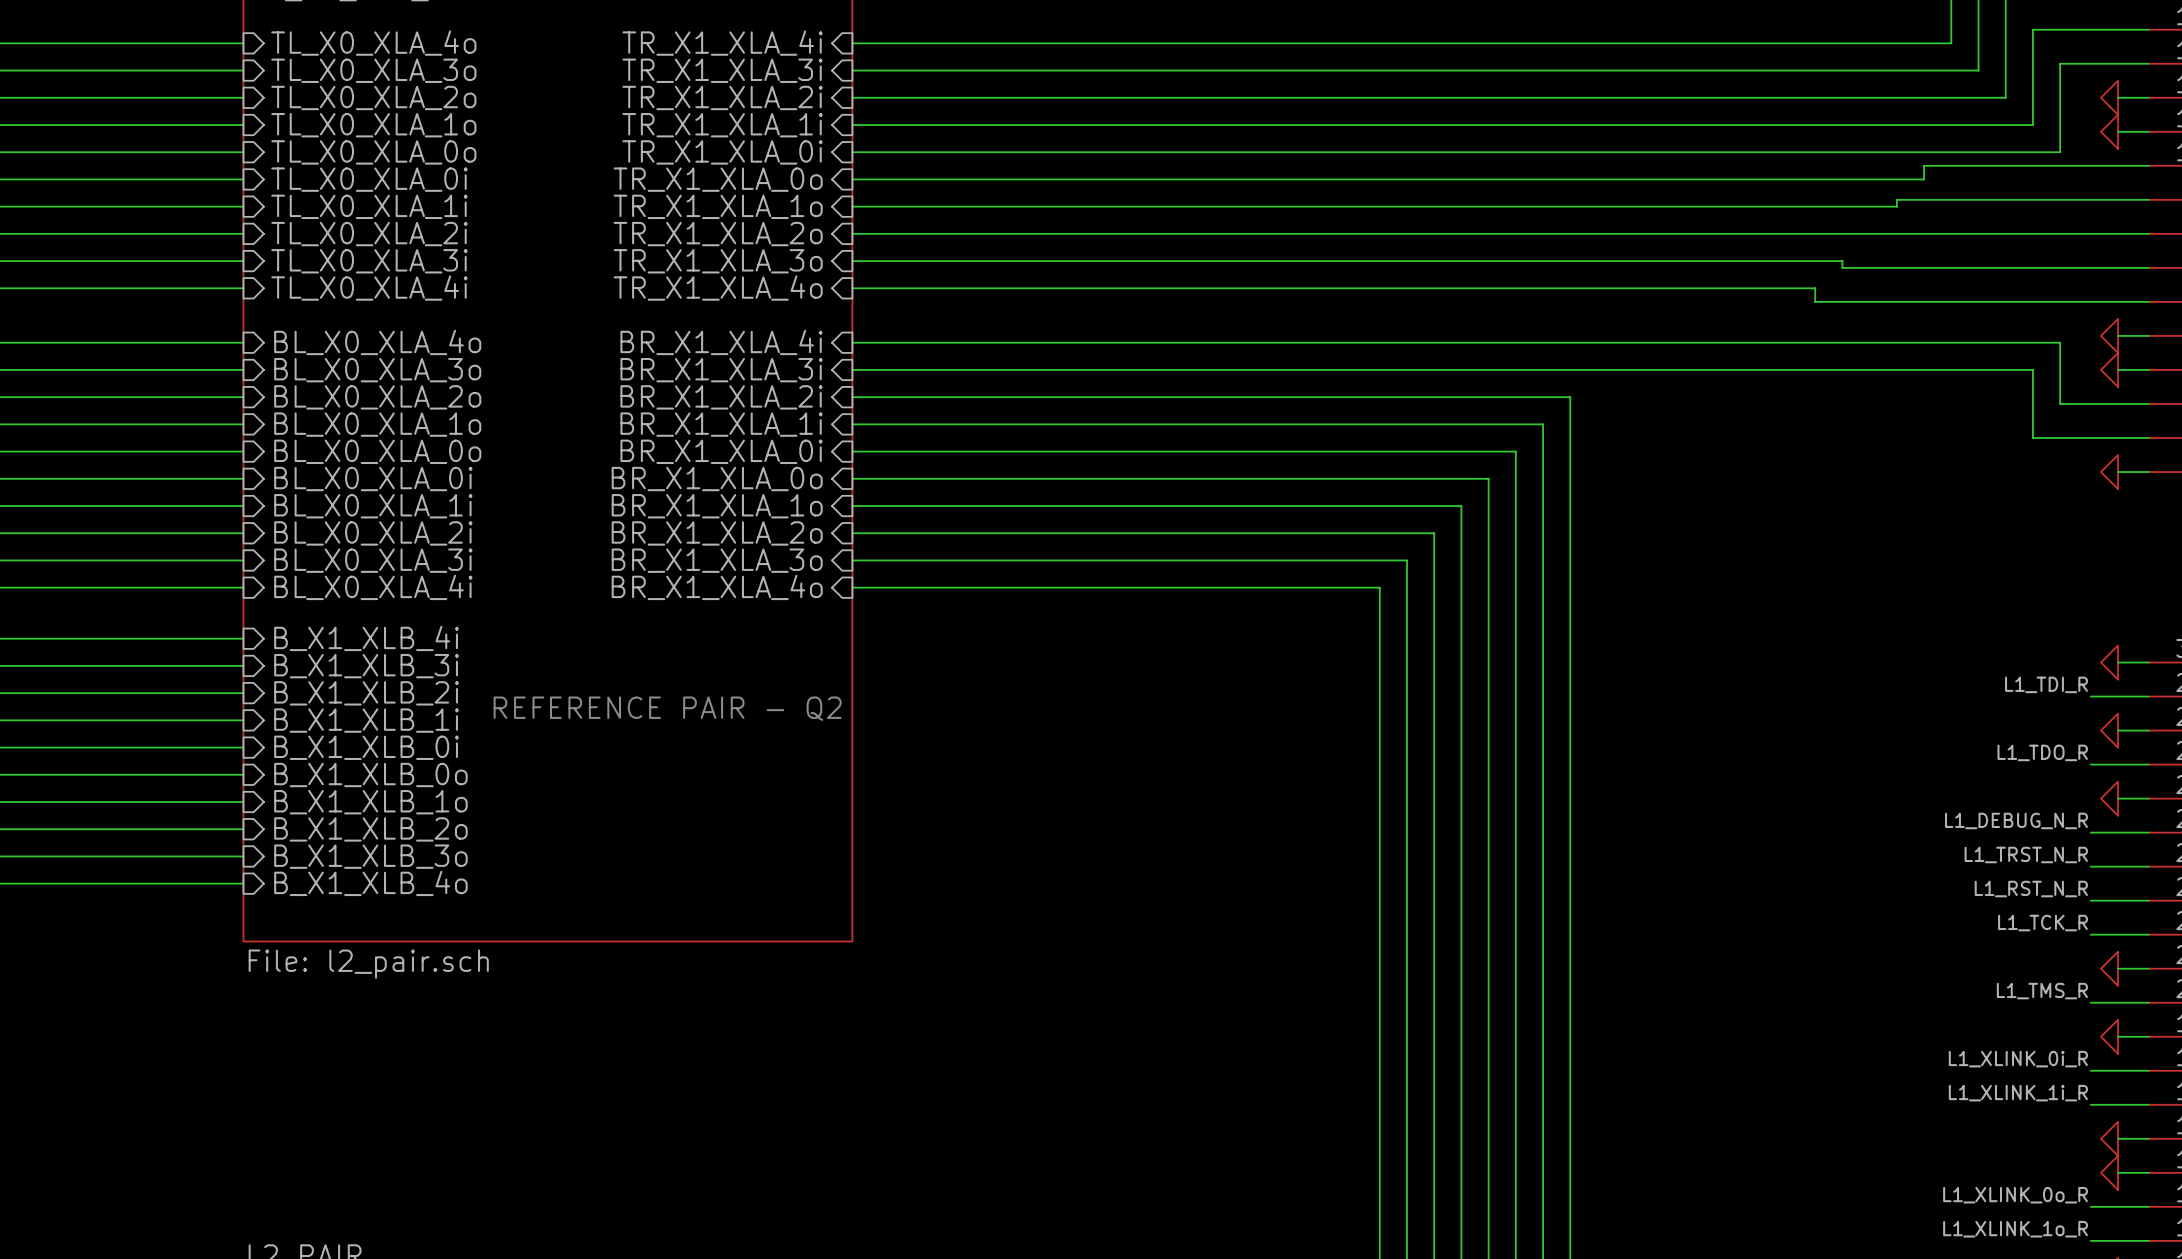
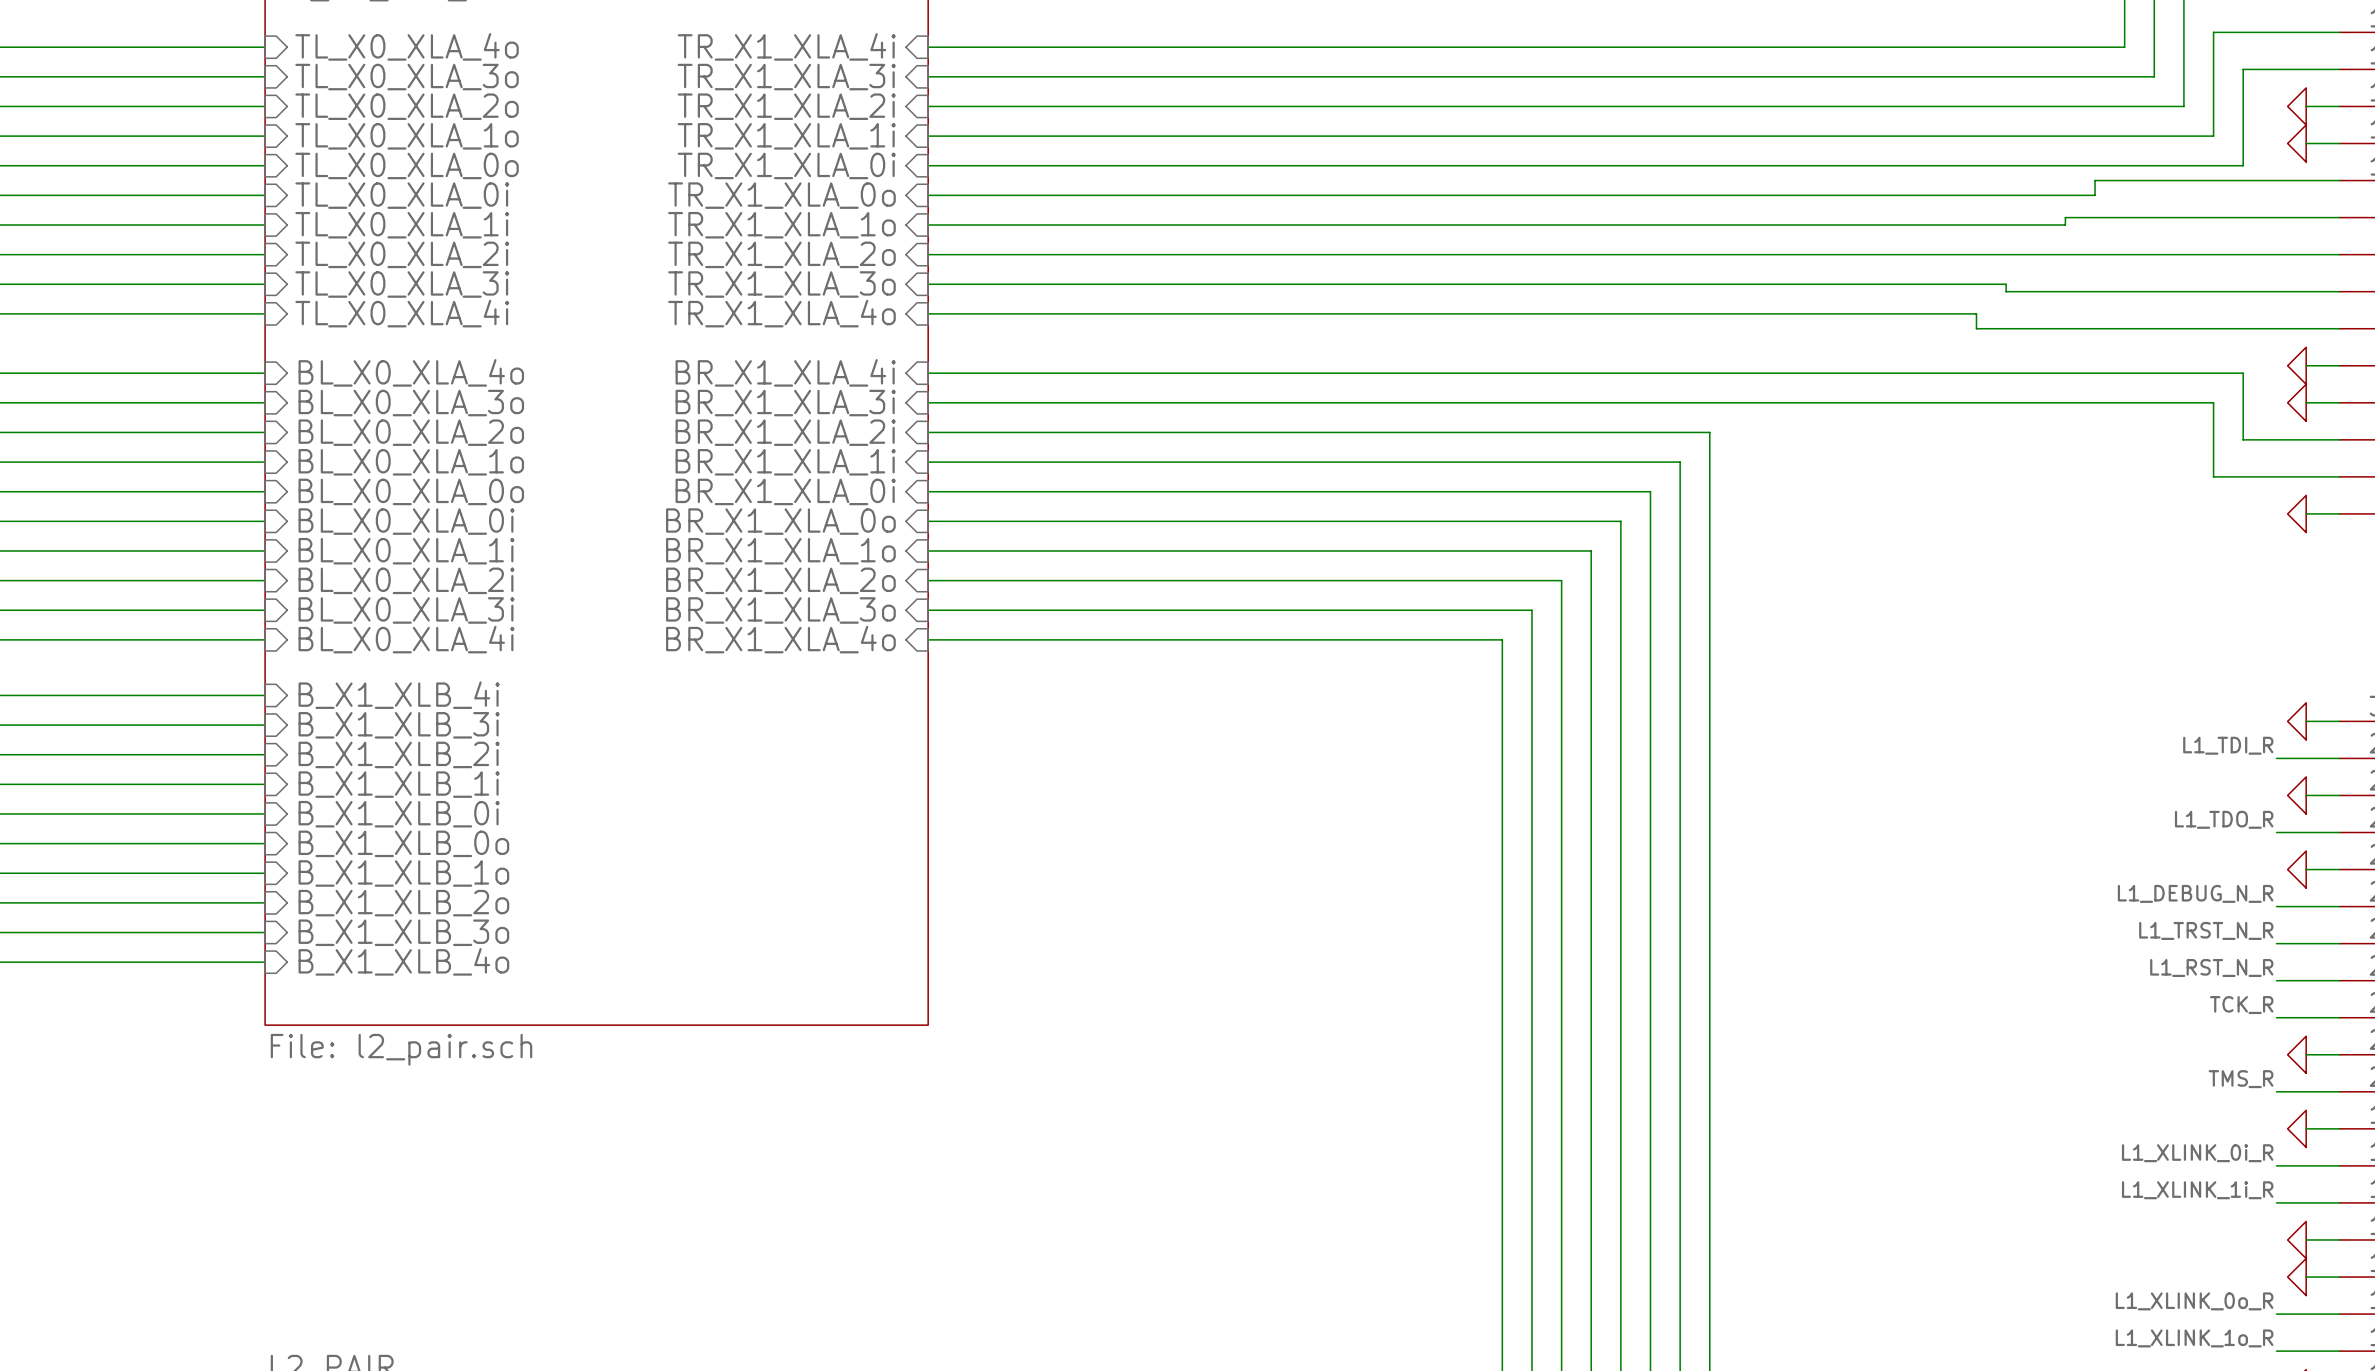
text: REFERENCE PAIR - Q2 (667, 708) -> none
label: L1_TCK_R (2043, 923) -> TCK_R (2241, 1005)
label: L1_TMS_R (2042, 991) -> TMS_R (2241, 1079)

